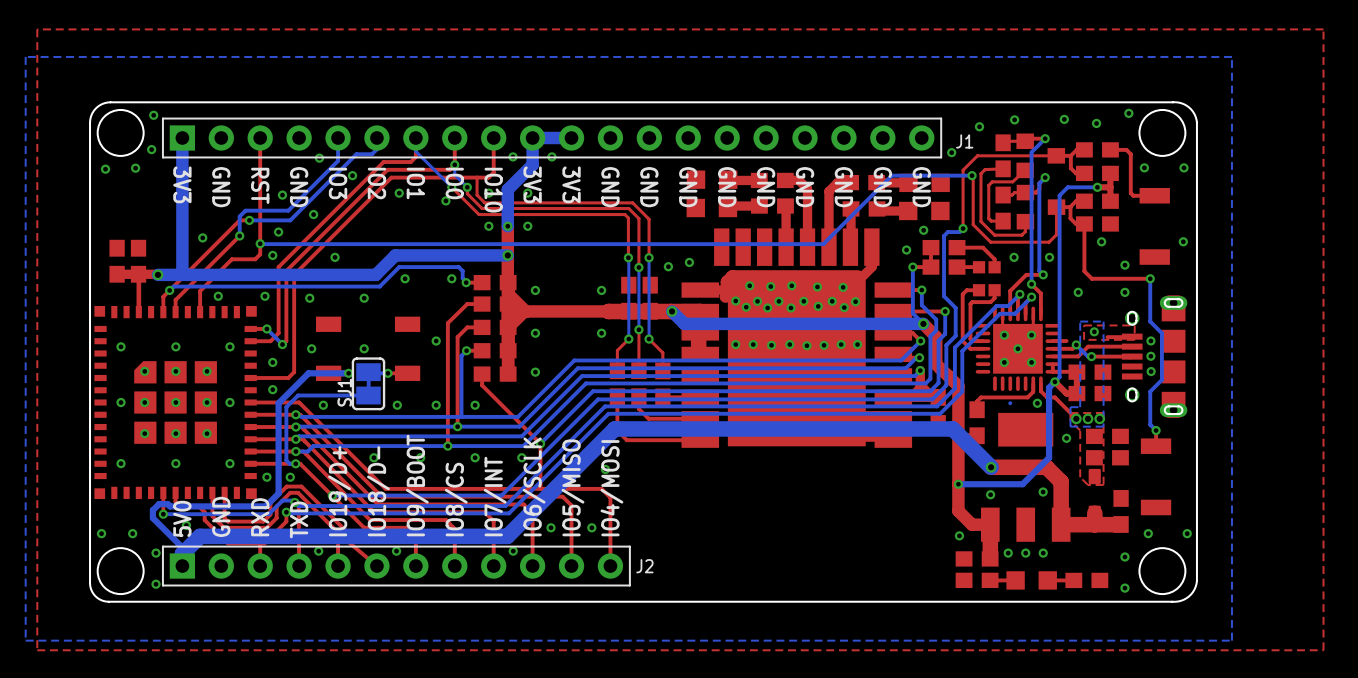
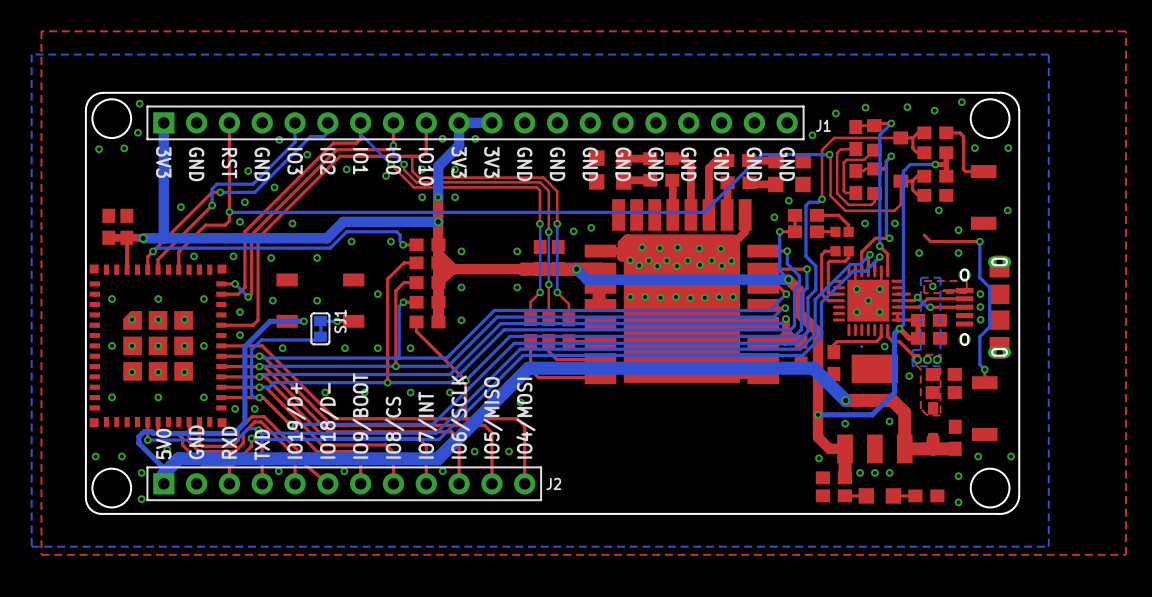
top track: (1070, 217) (1075, 223) (1084, 223) (1084, 271) -> (912, 189) (917, 194) (923, 194)
SJ1 footprint: [351, 357, 386, 411] -> [310, 312, 331, 346]
SJ1 name position: SJ1 (344, 392) -> SJ1 (340, 321)

